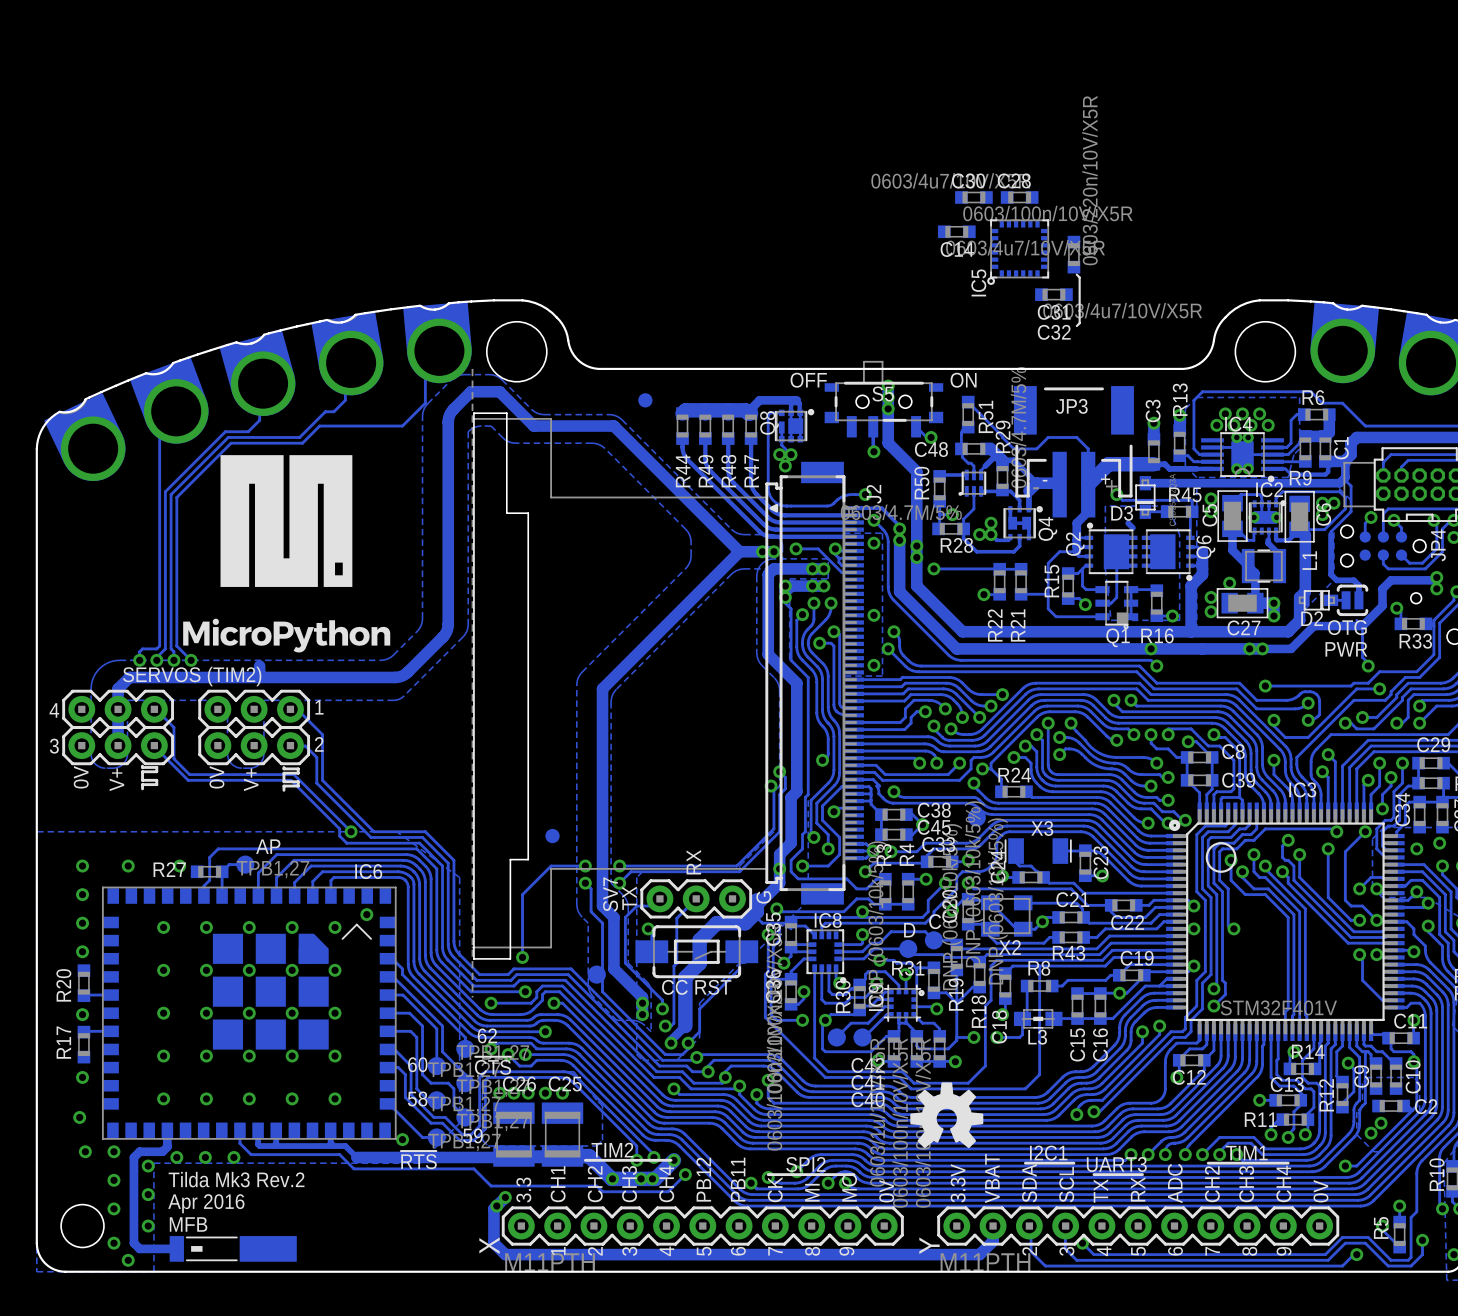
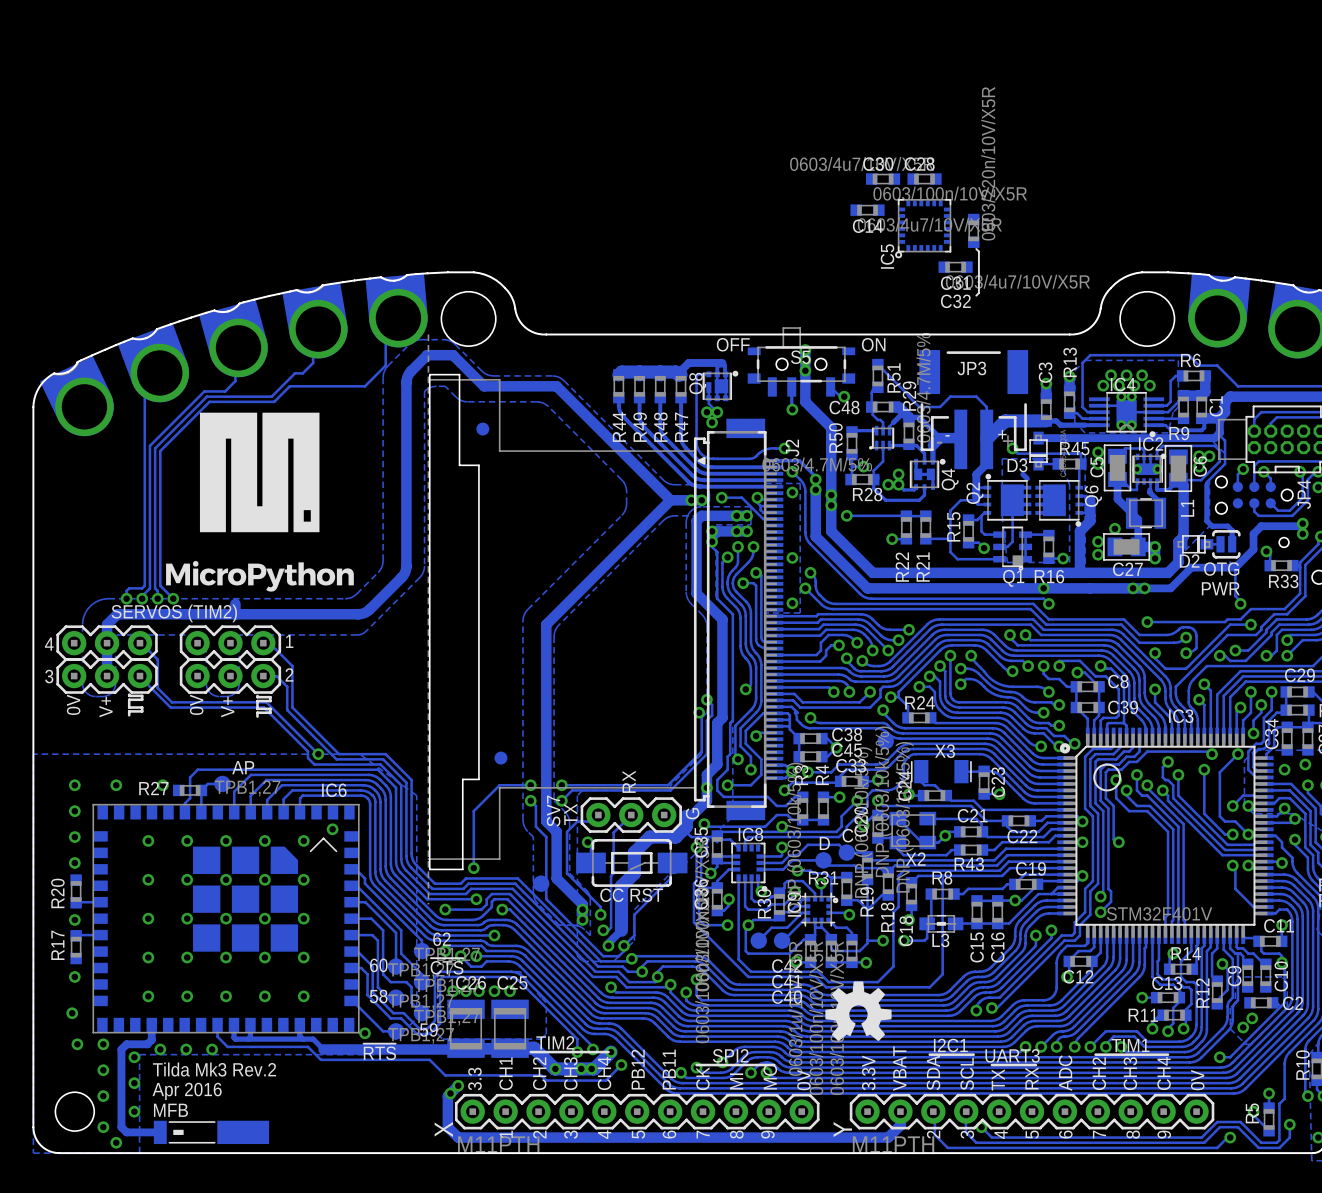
part position: (645, 400) -> (482, 429)

